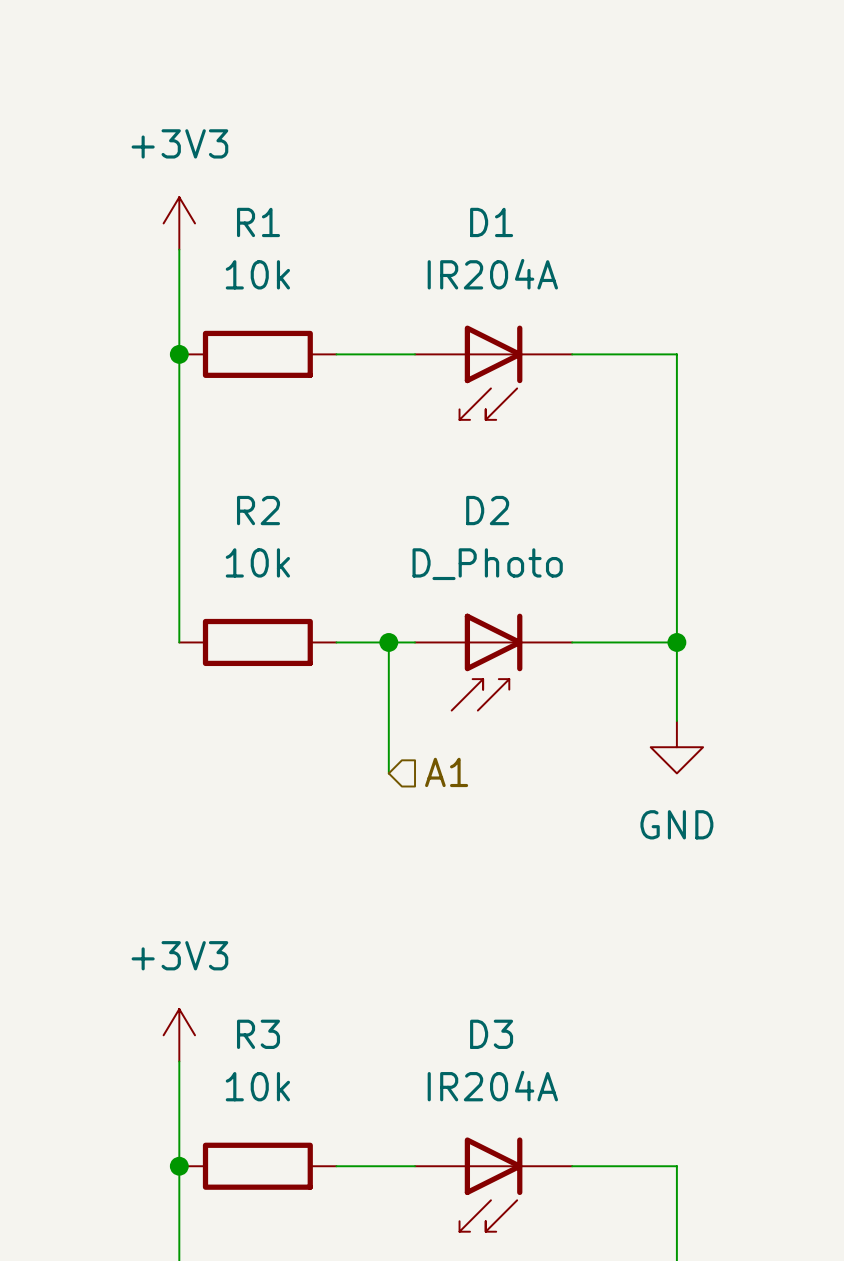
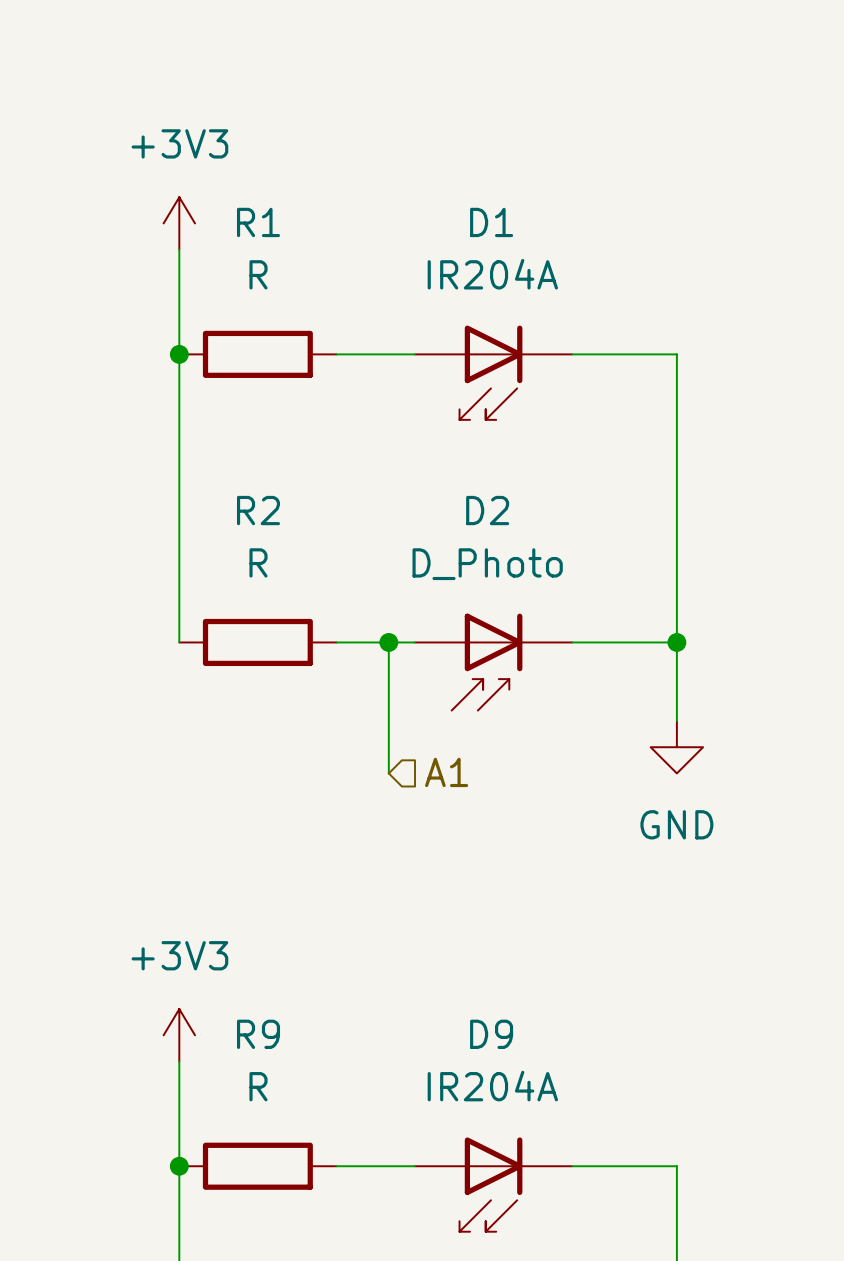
R1 value: 10k (257, 274) -> R (258, 274)
R2 value: 10k (257, 562) -> R (258, 562)
R3 name: R3 (258, 1034) -> R9 (258, 1034)
D3 name: D3 (491, 1034) -> D9 (491, 1034)
R3 value: 10k (257, 1086) -> R (258, 1086)

